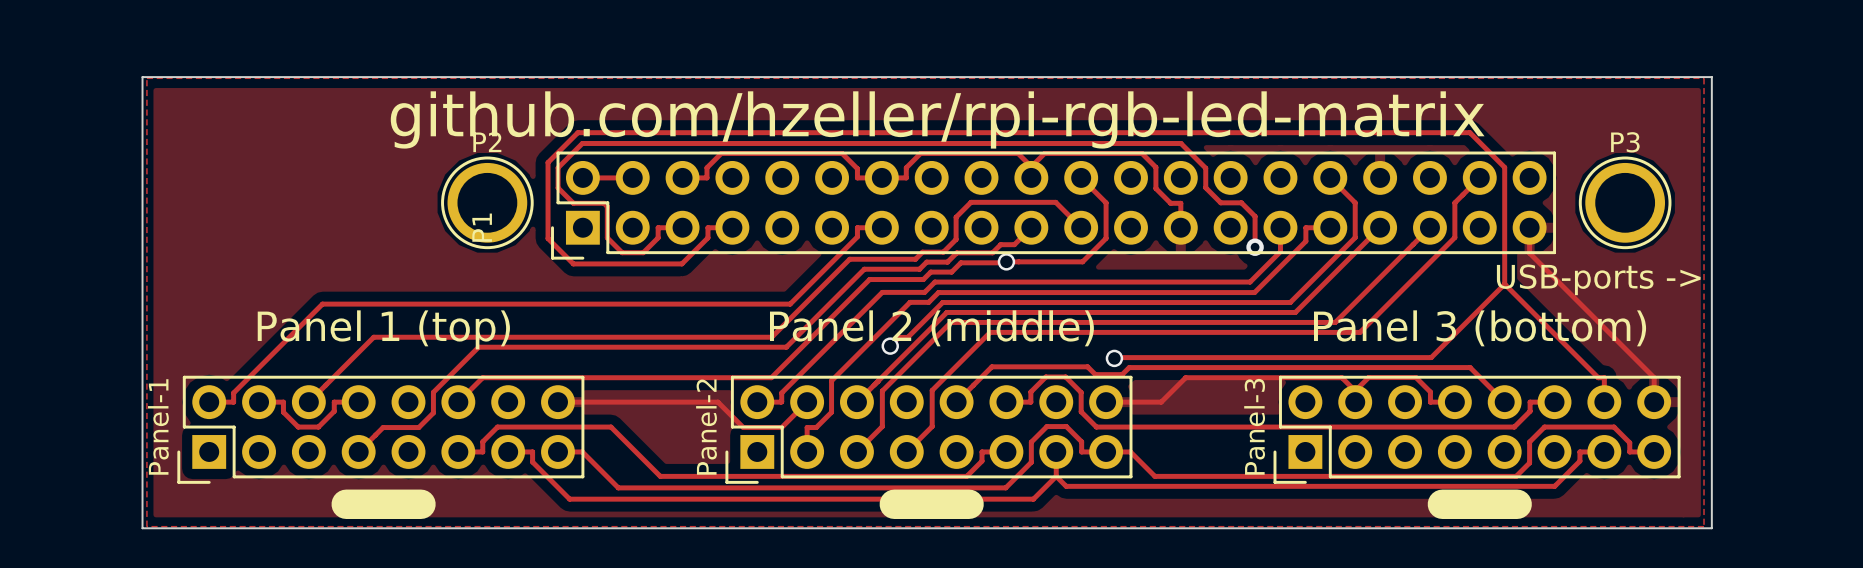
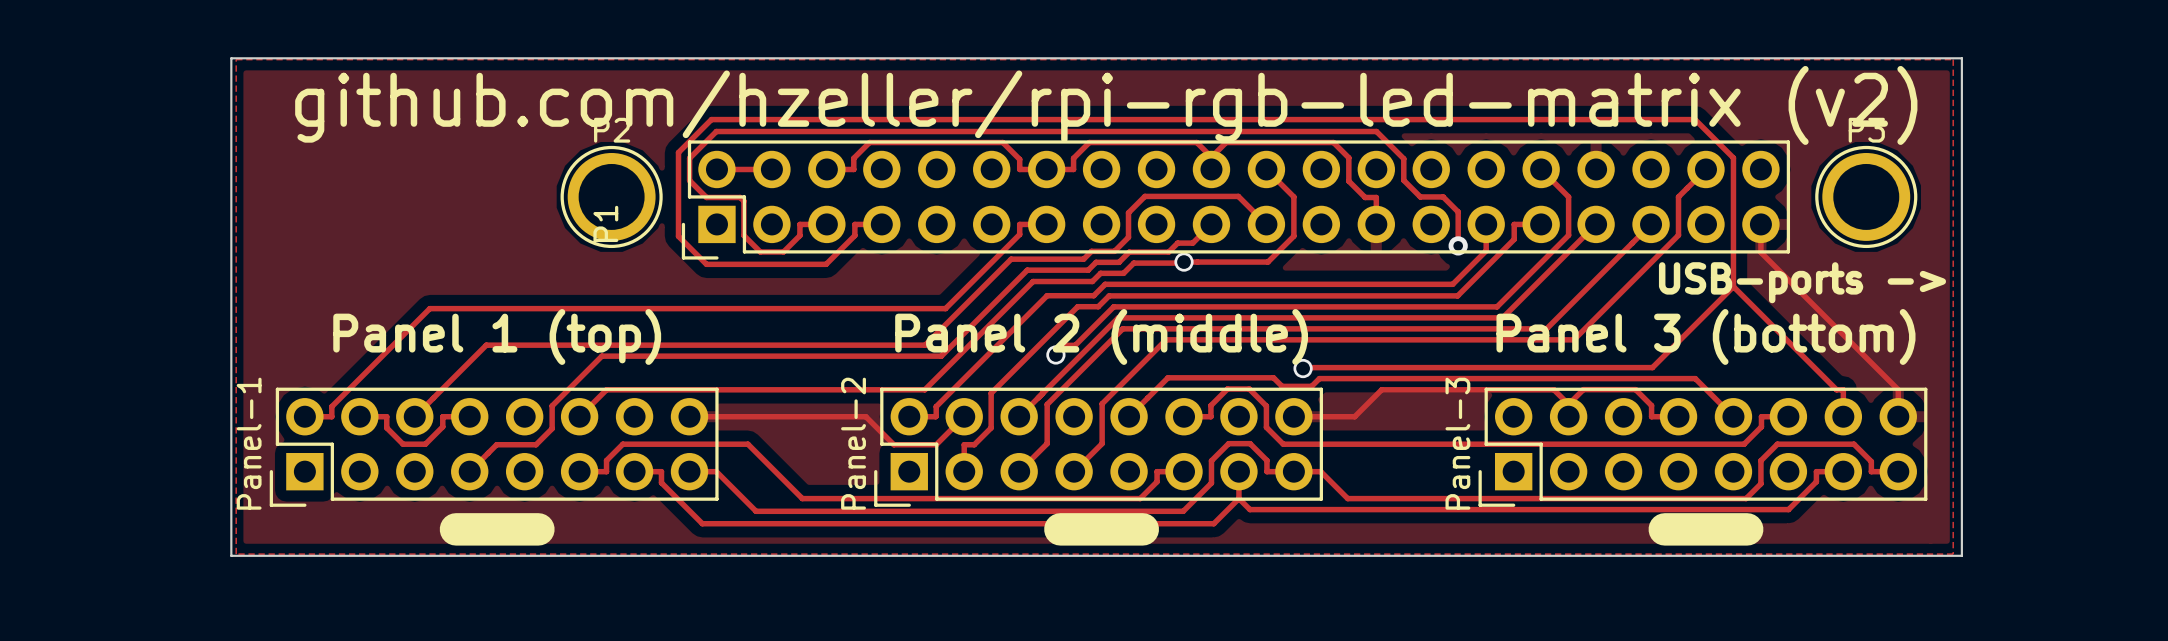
text: github.com/hzeller/rpi-rgb-led-matrix (937, 119) -> github.com/hzeller/rpi-rgb-led-matrix (v2) (1106, 105)

